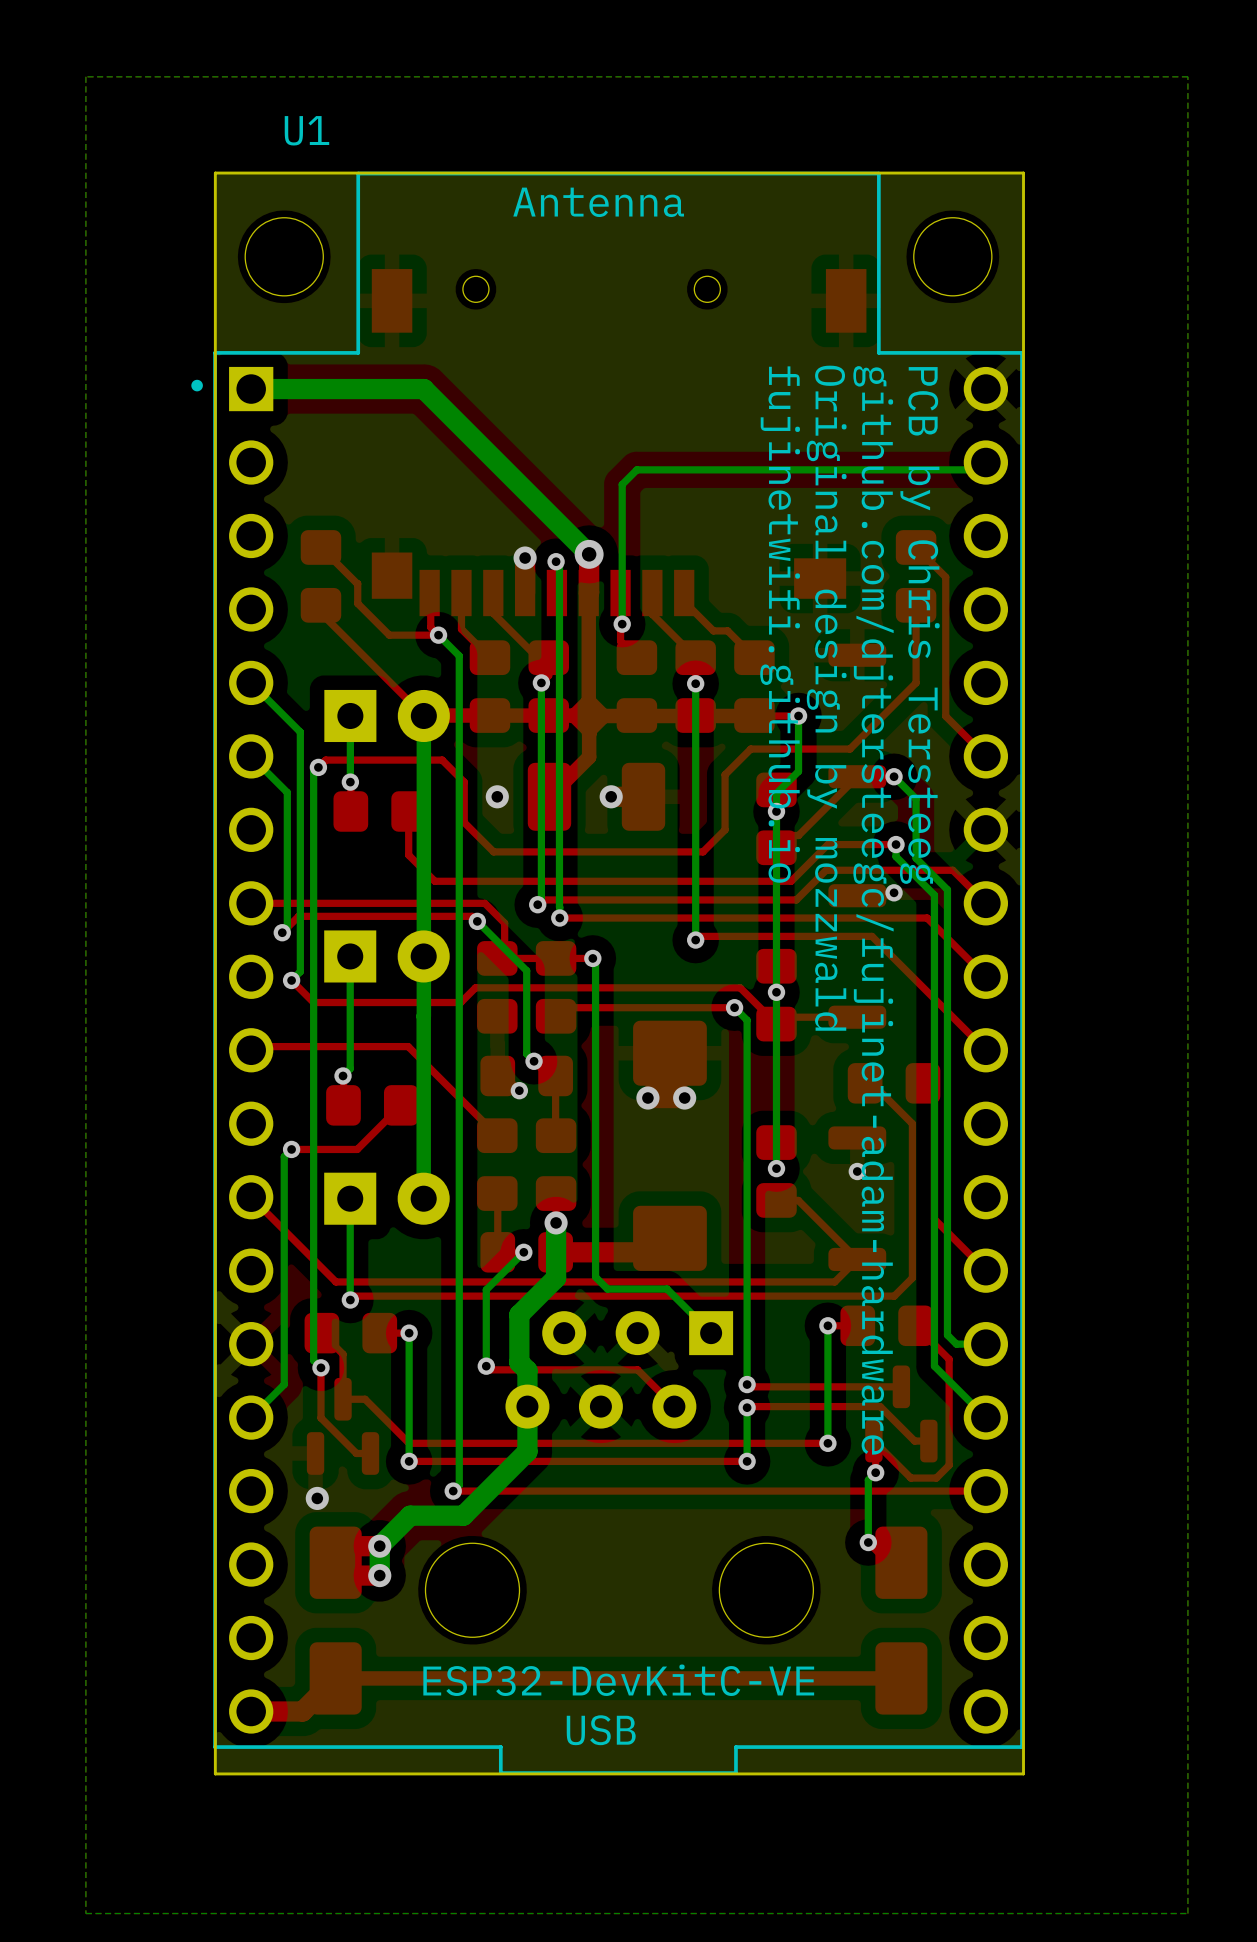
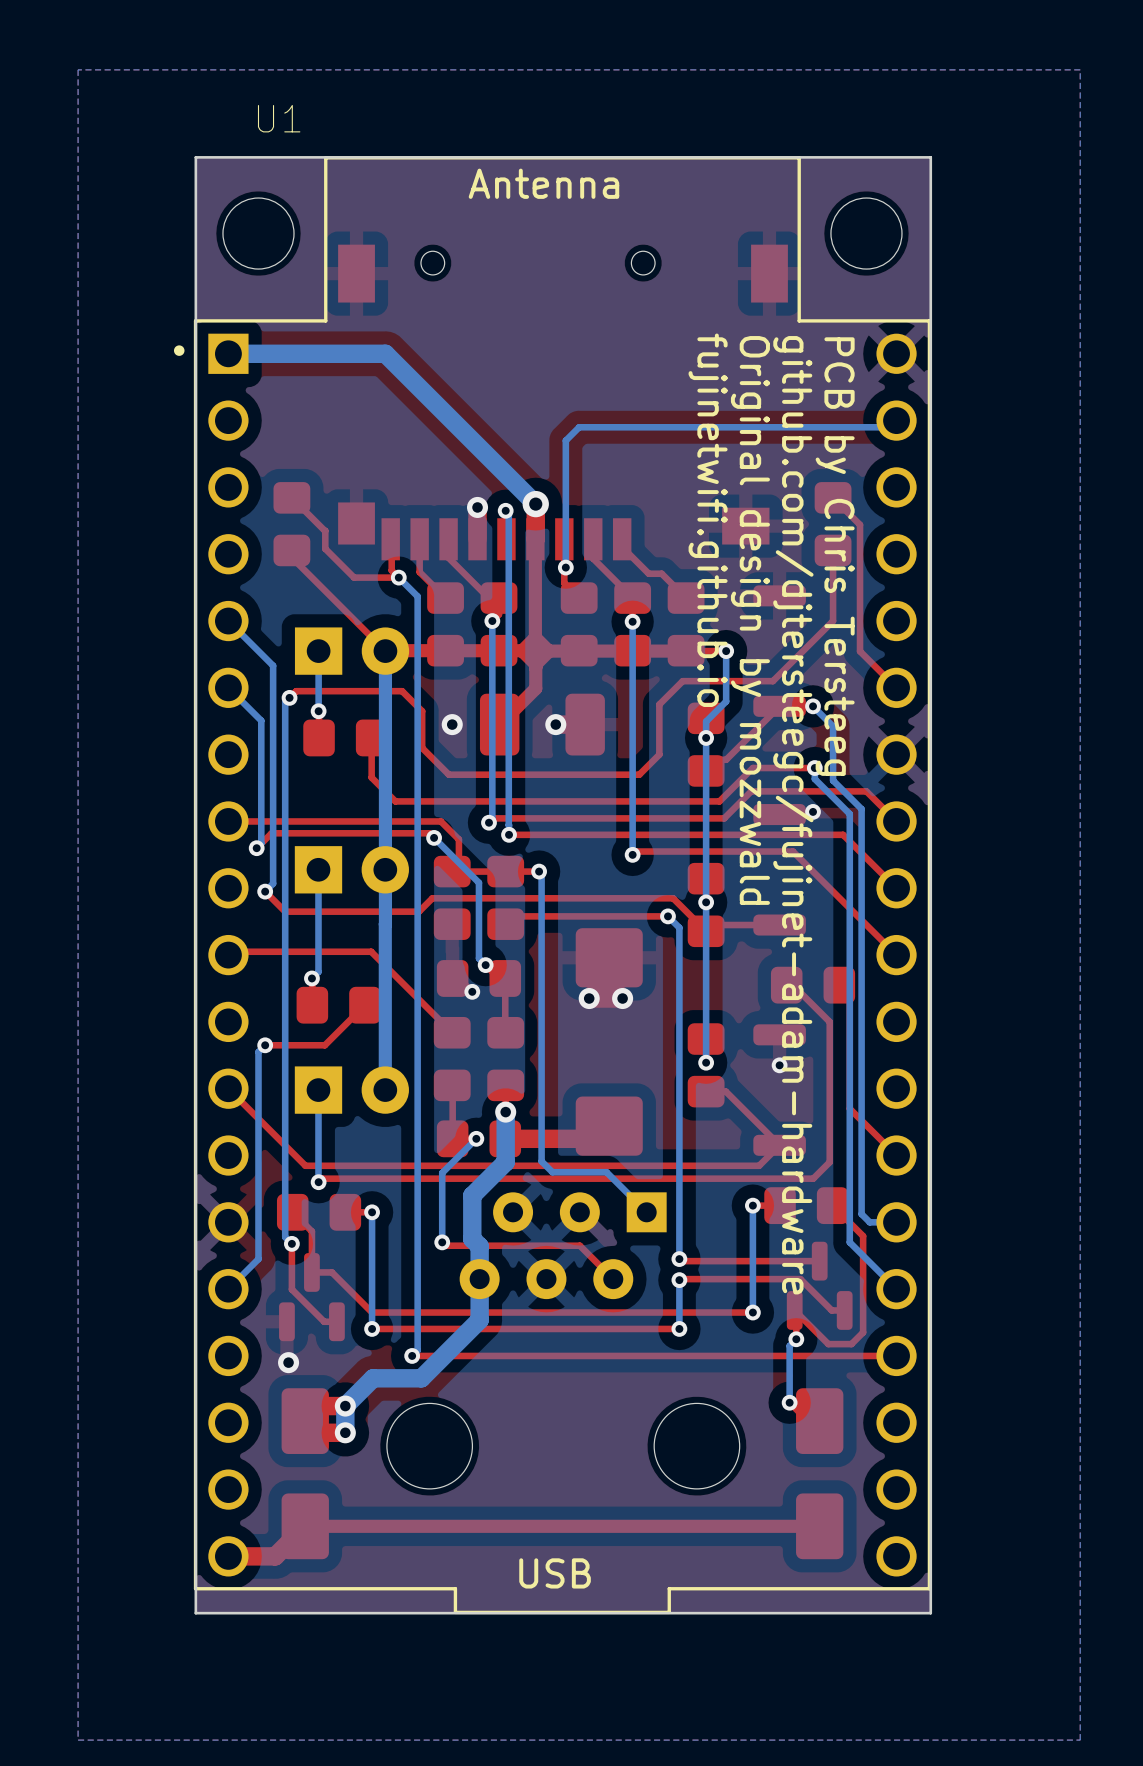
U1 value: ESP32-DevKitC-VE (618, 1680) -> none

